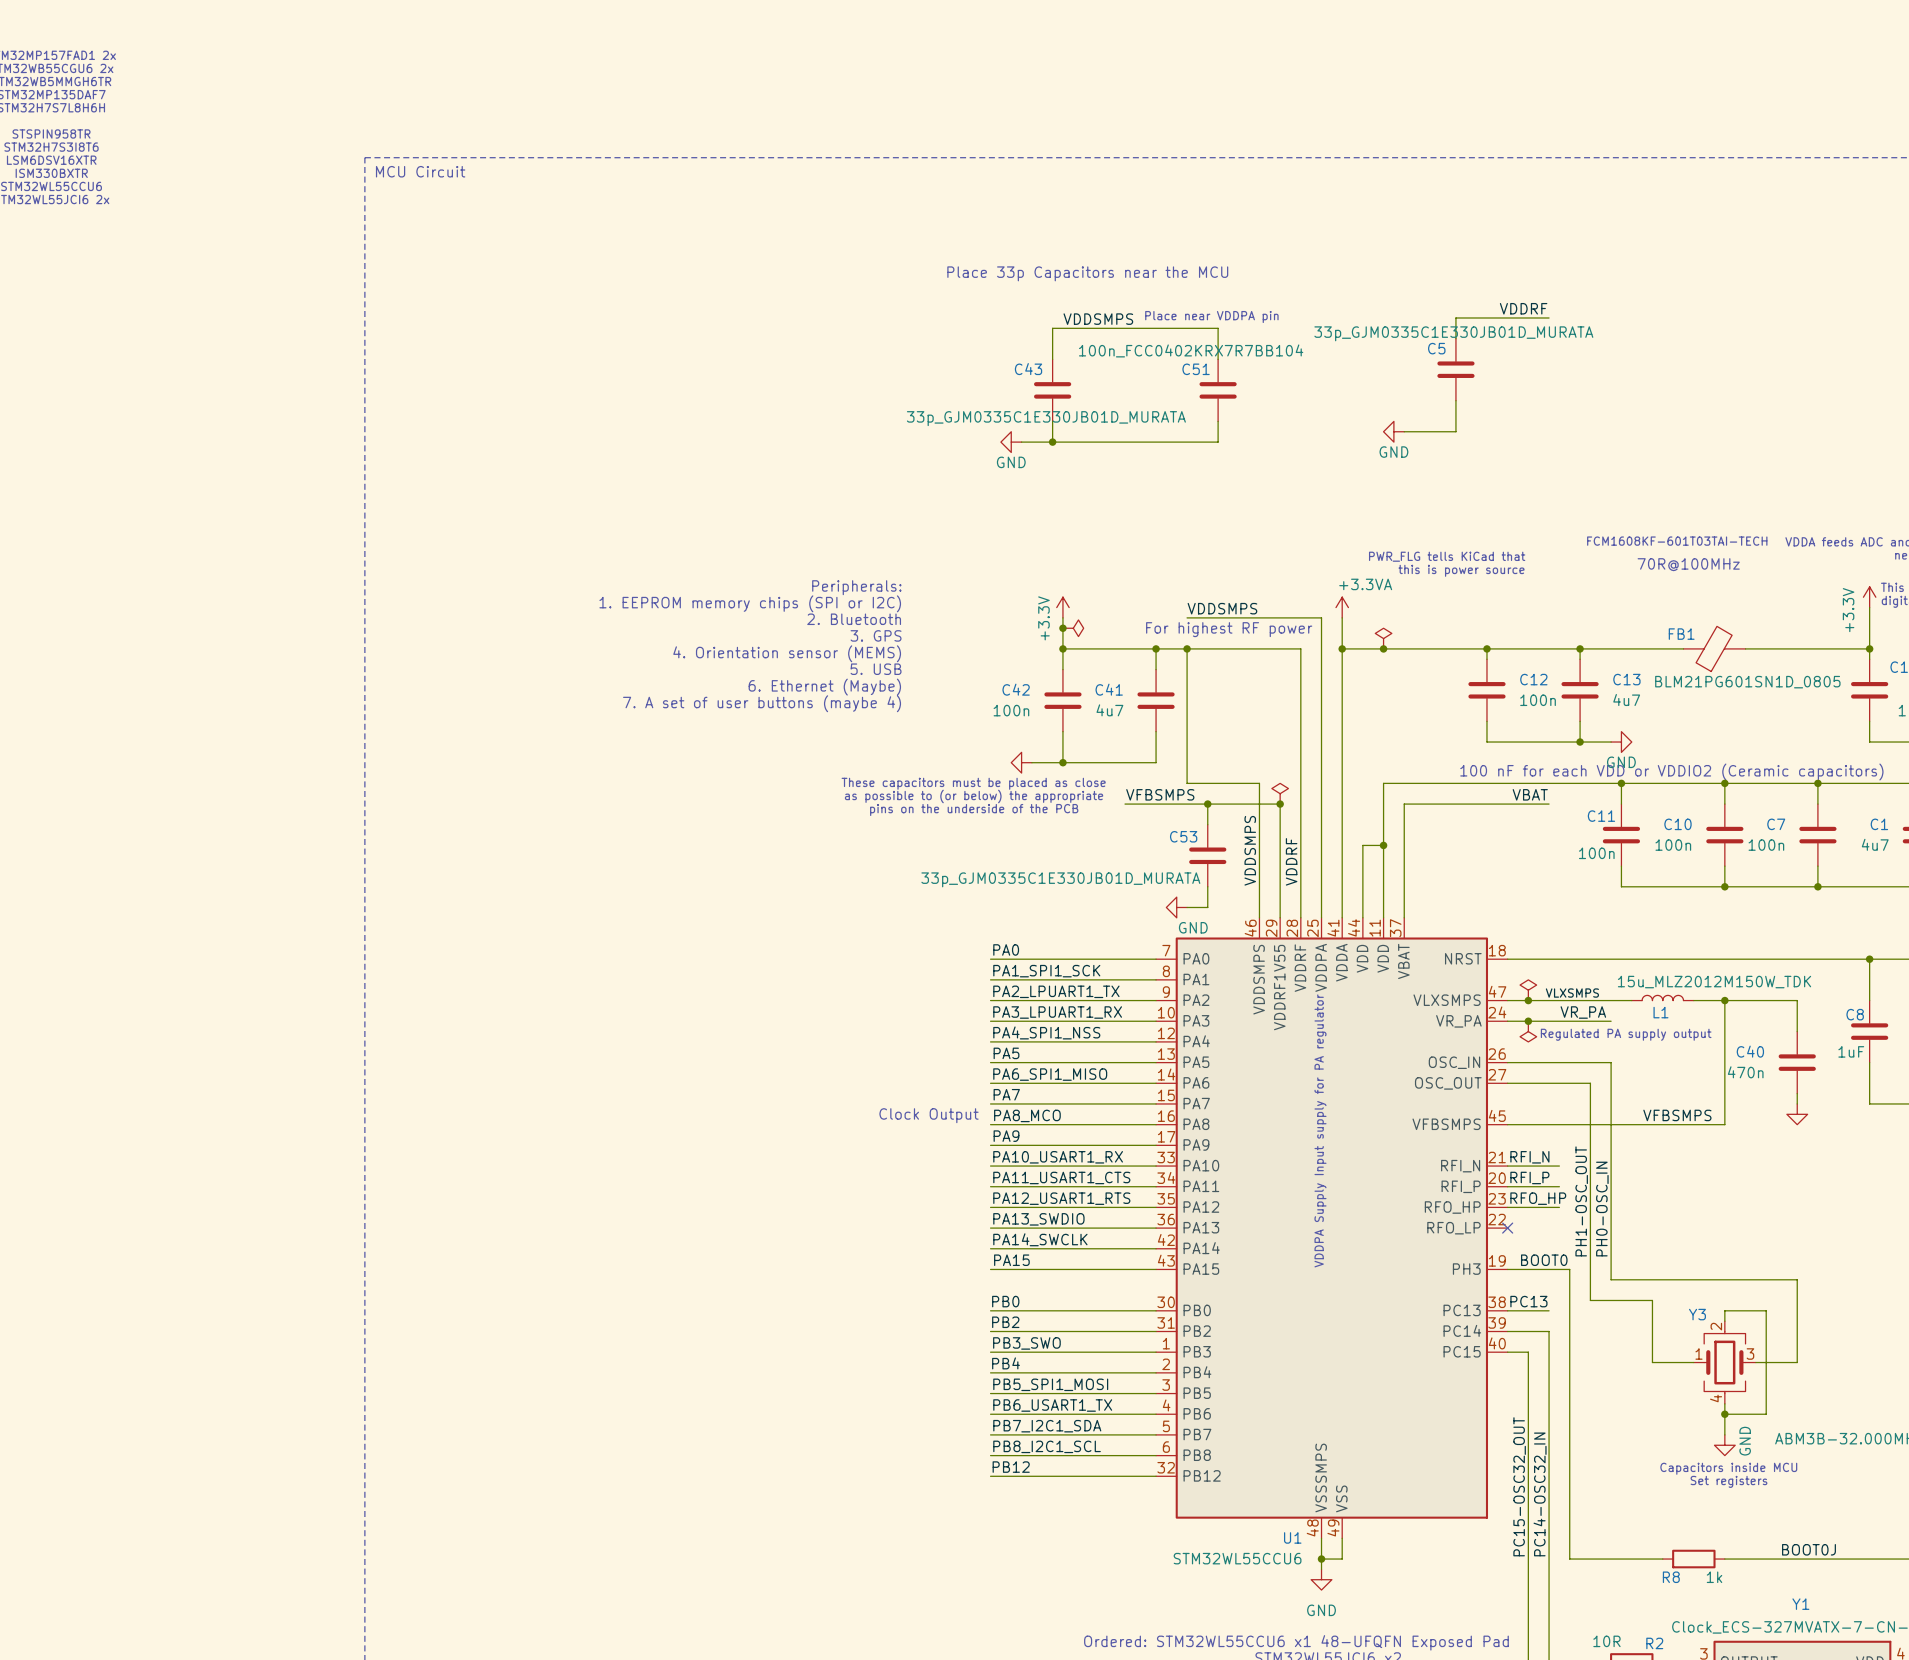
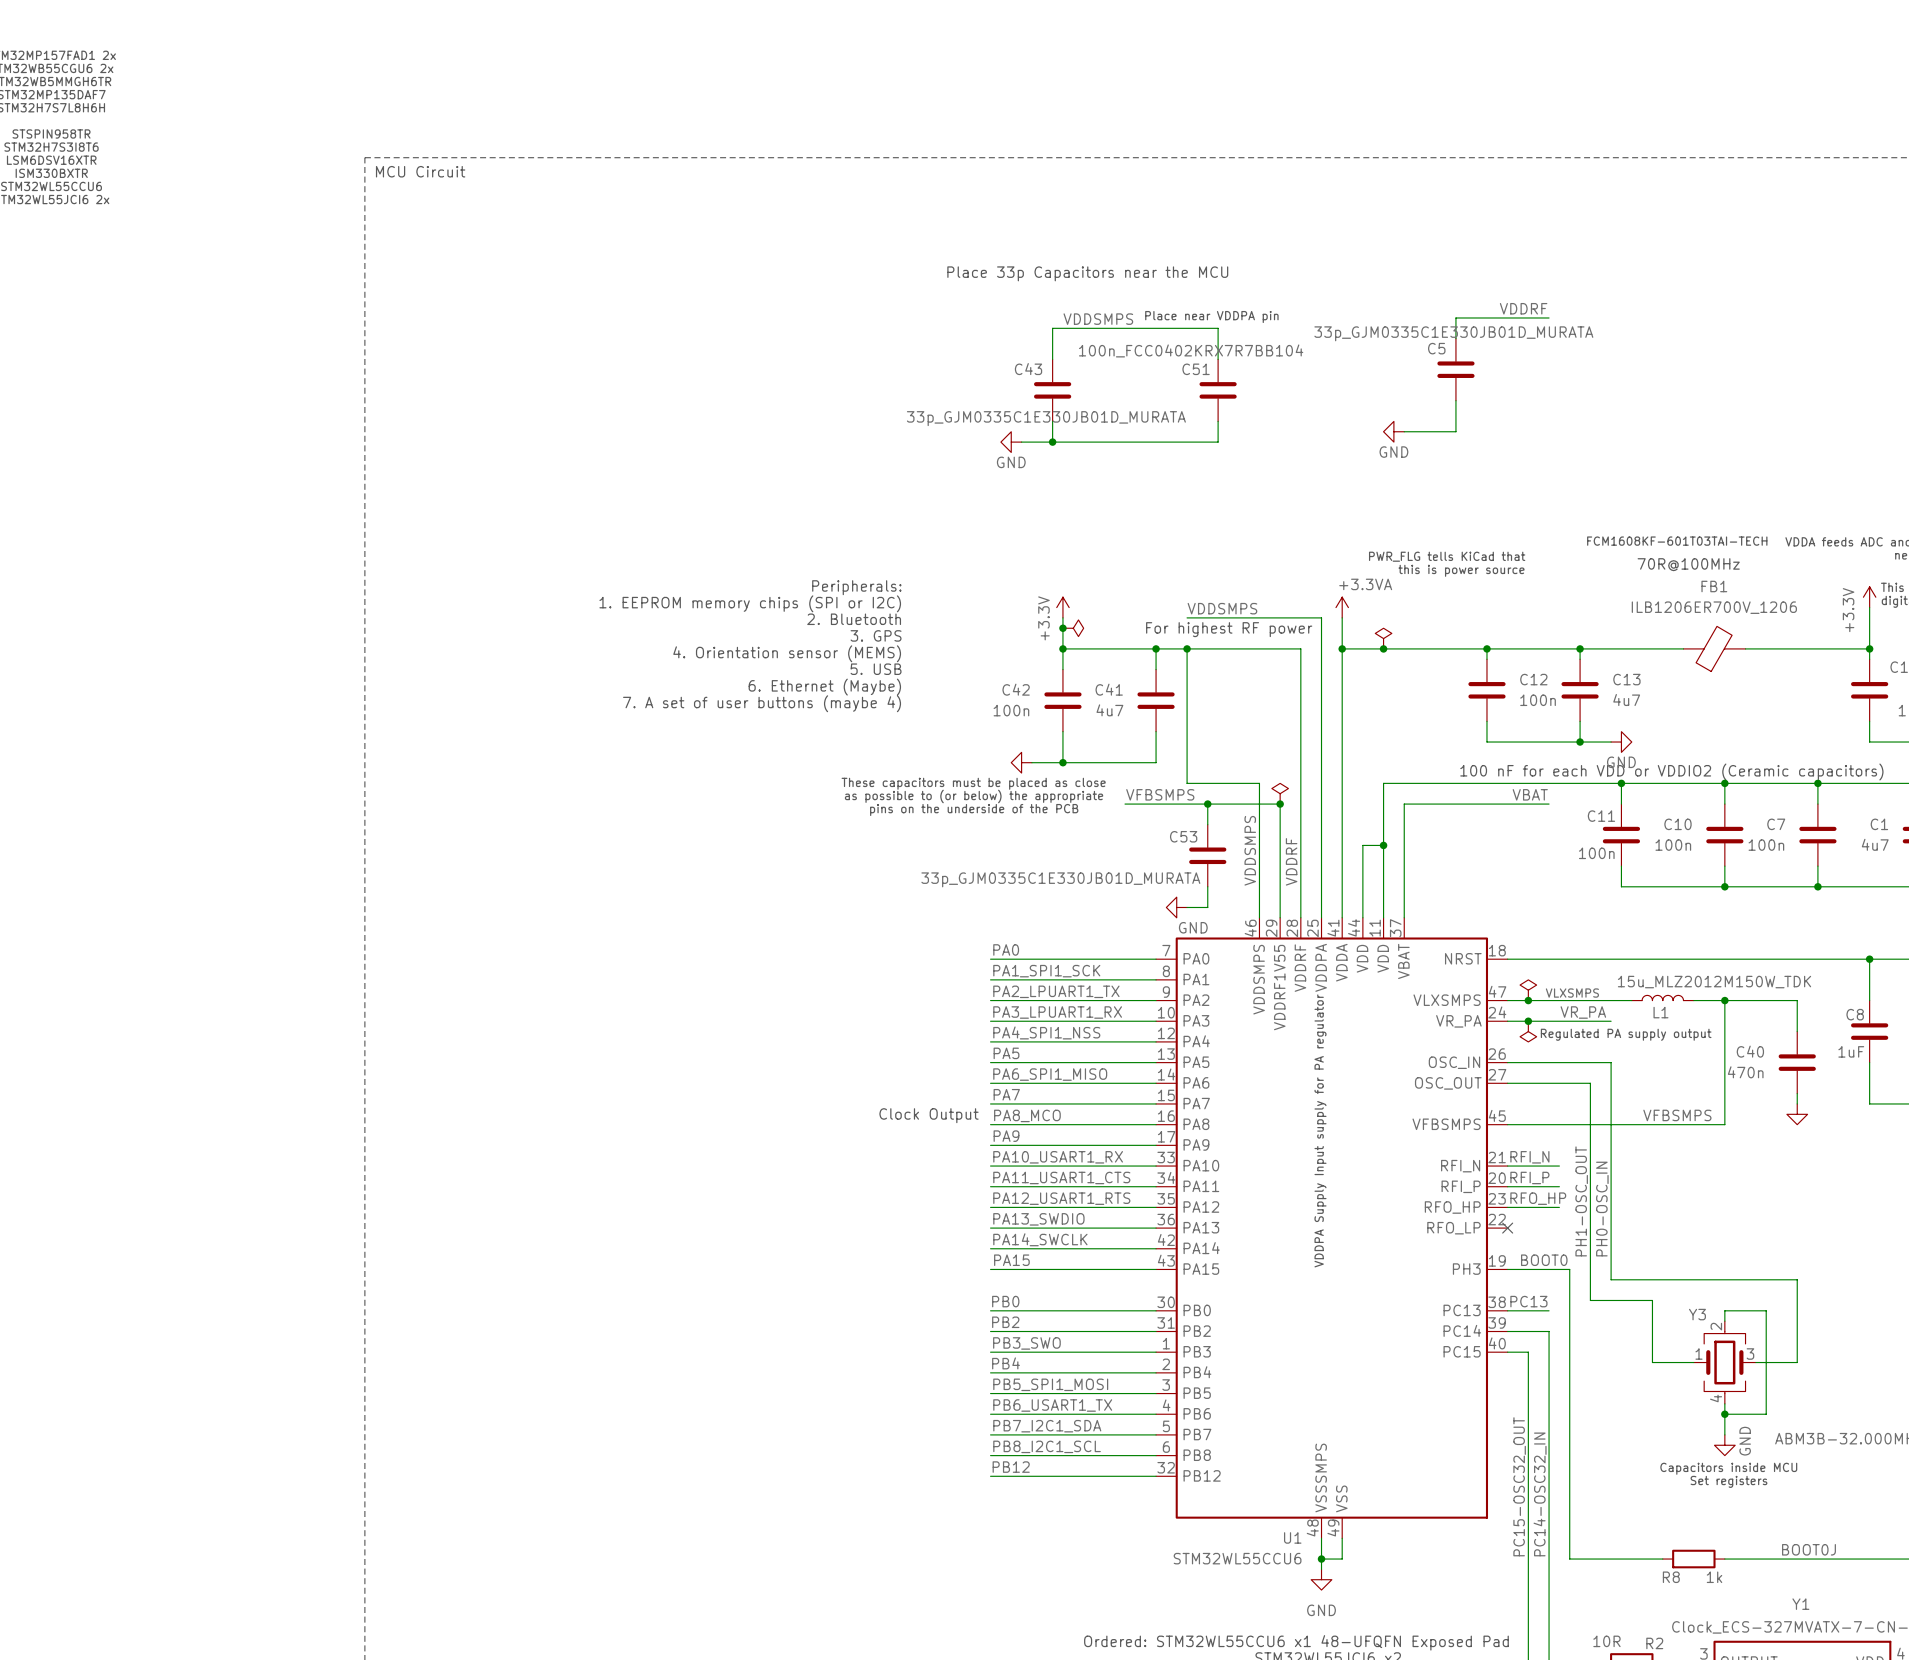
FB1 name position: FB1 (1681, 634) -> FB1 (1714, 586)
FB1 value: BLM21PG601SN1D_0805 (1747, 682) -> ILB1206ER700V_1206 (1714, 607)

